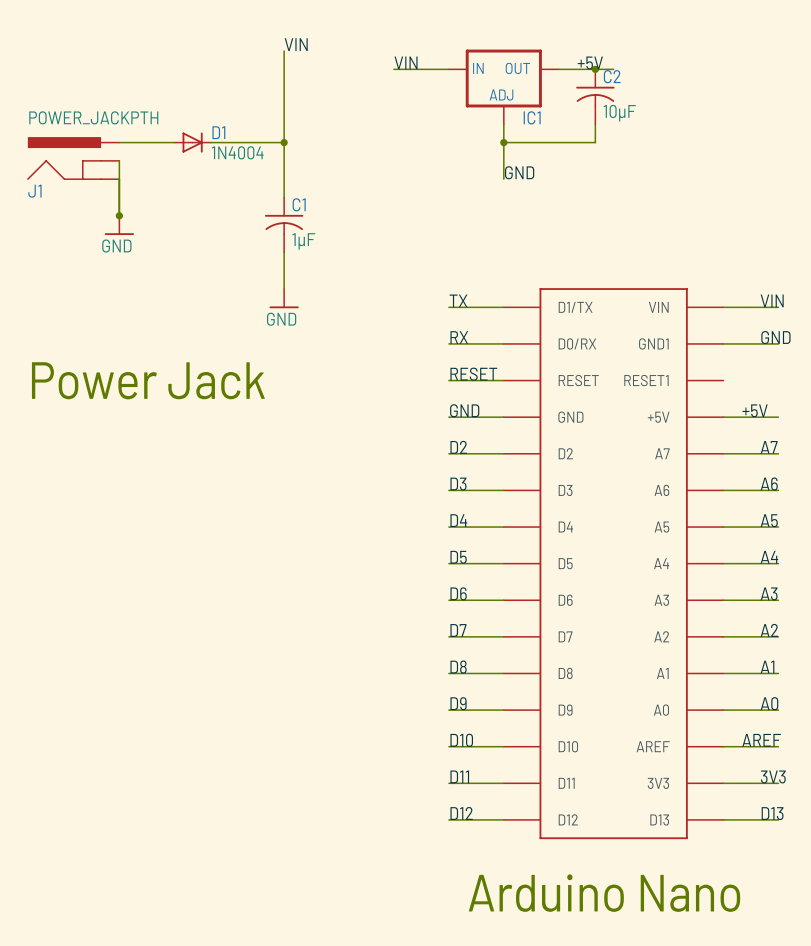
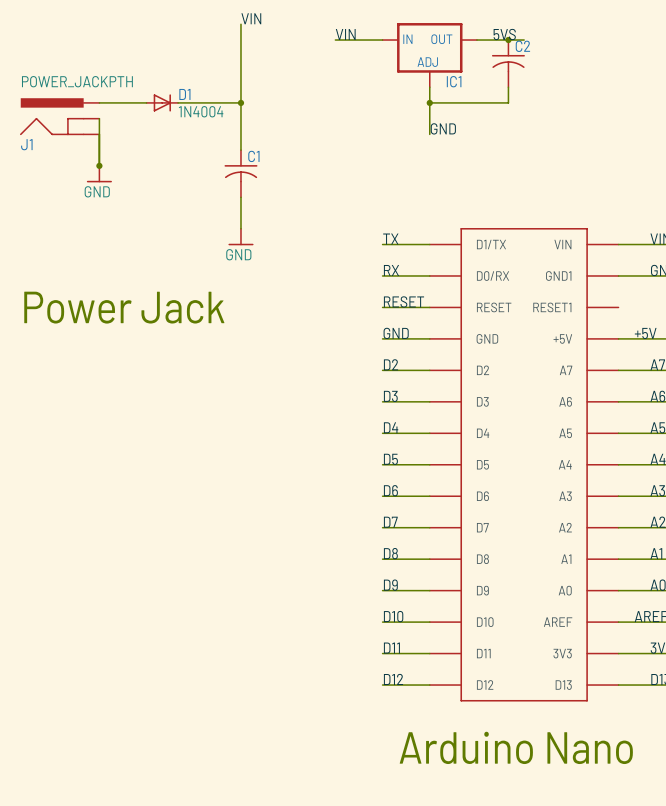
label: +5V (590, 63) -> 5VS (504, 34)
C2 value: 10μF (619, 113) -> none
C1 value: 1μF (303, 241) -> none

